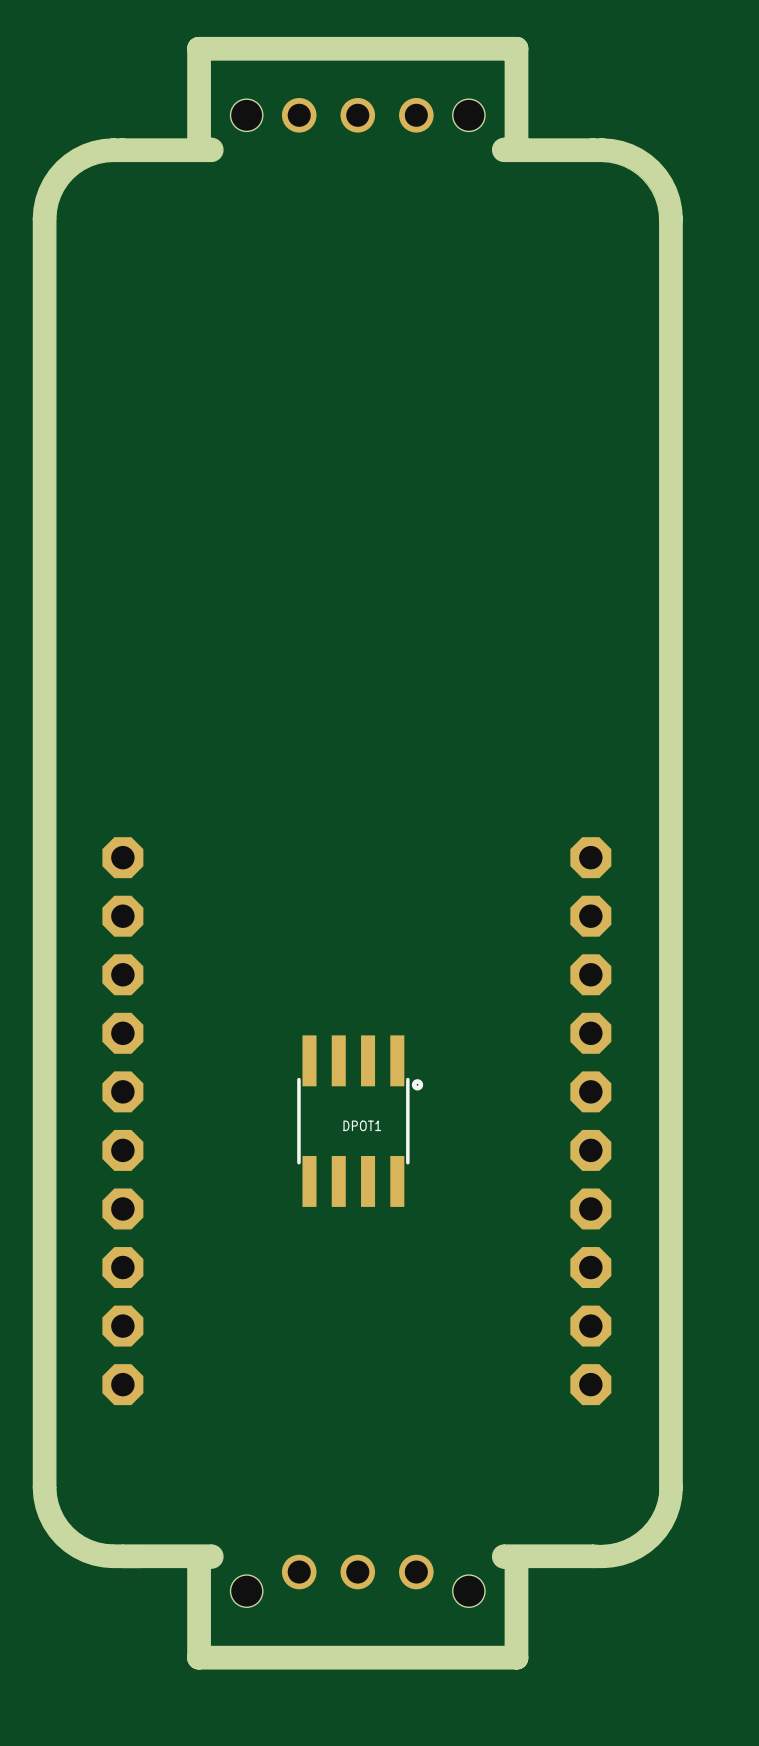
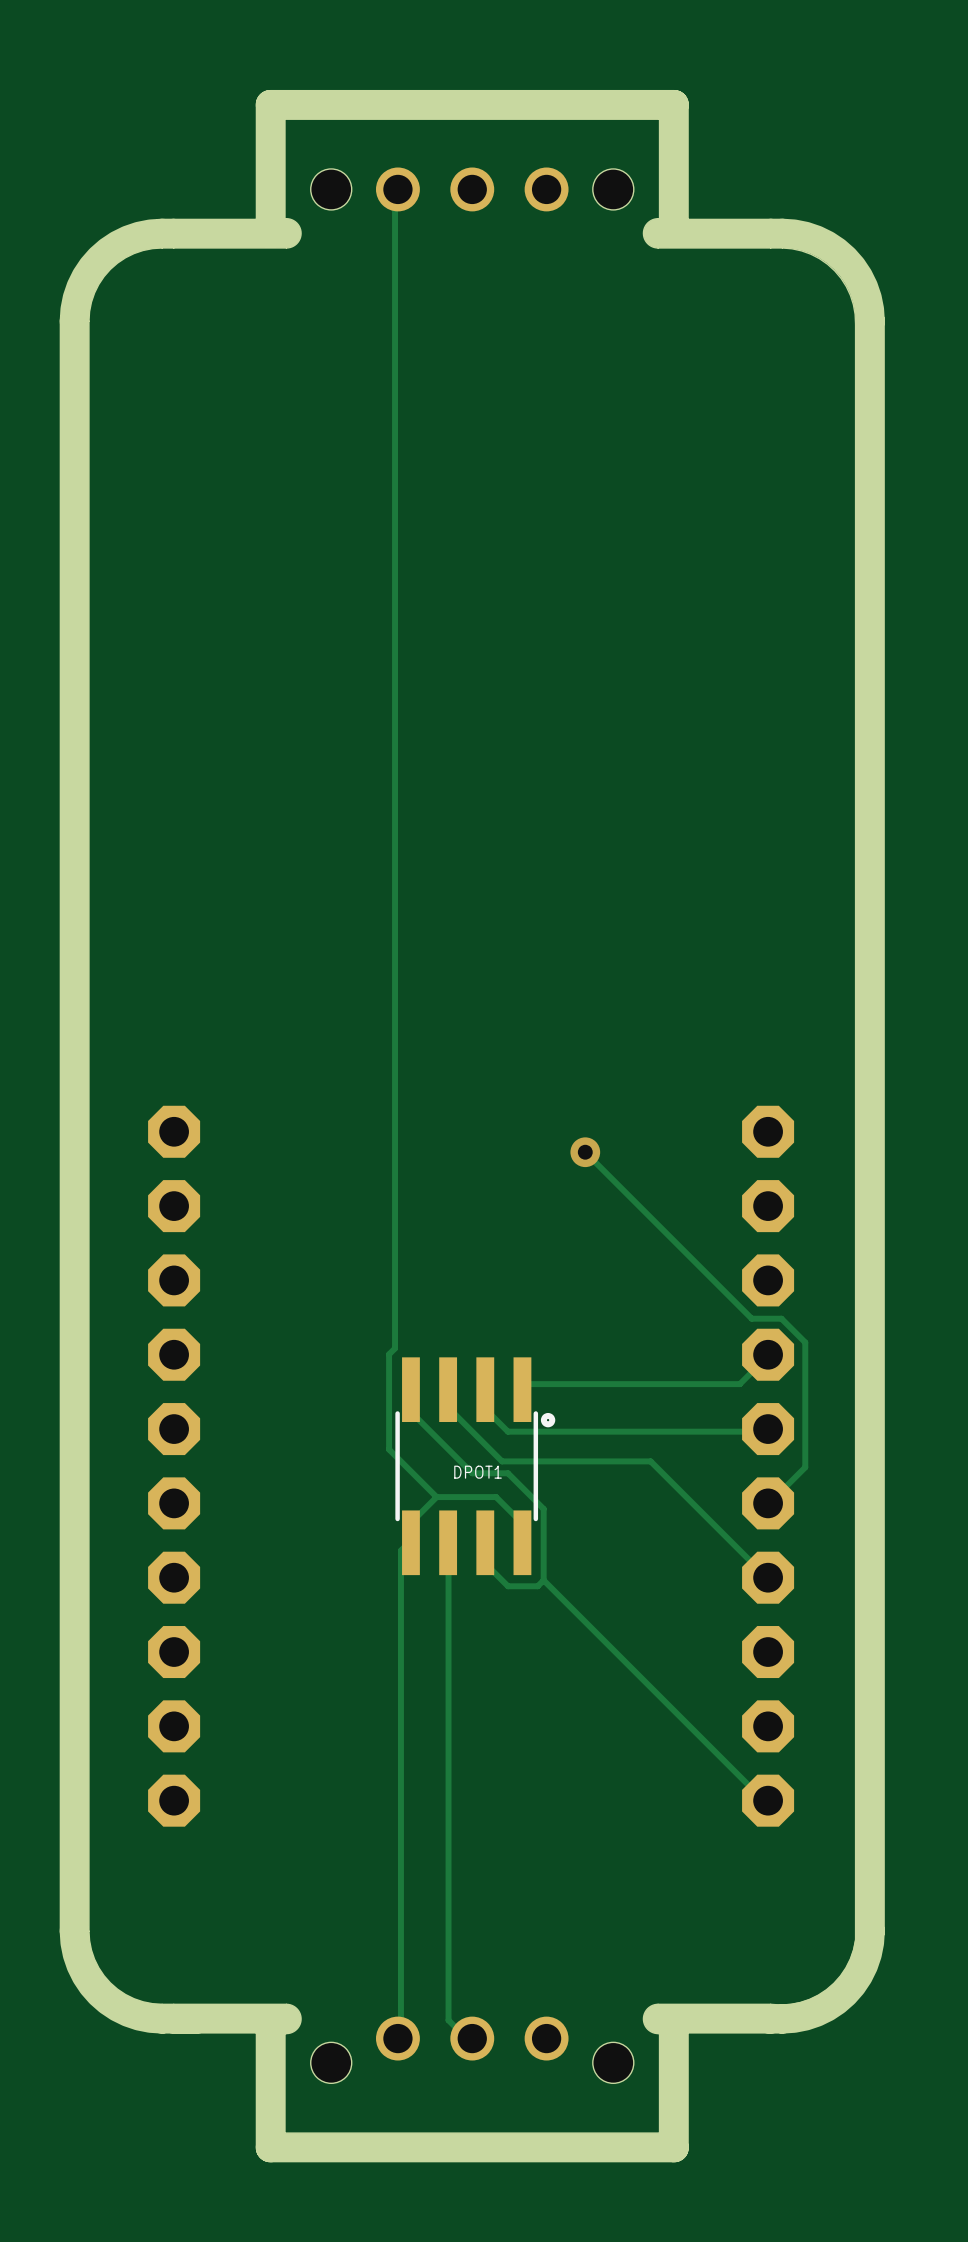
track: none -> (397, 189) (395, 194) (395, 1348) (389, 1354) (389, 1449) (436, 1497)
track: none -> (585, 1152) (751, 1318) (781, 1318) (805, 1342) (805, 1467) (768, 1503)
via: none -> (585, 1152)
track: none -> (768, 1354) (739, 1384) (525, 1384) (522, 1389)
track: none -> (410, 1389) (412, 1390) (412, 1413) (472, 1473) (507, 1473) (543, 1508) (543, 1580)
track: none -> (485, 1389) (490, 1390) (490, 1413) (507, 1431) (763, 1431) (768, 1429)
track: none -> (448, 1390) (448, 1407) (502, 1461) (650, 1461) (768, 1577)
track: none -> (436, 1497) (496, 1497) (519, 1520) (519, 1538) (522, 1542)
track: none -> (436, 1497) (412, 1520) (412, 1538) (410, 1542) (400, 1550) (400, 2038) (397, 2038)
track: none -> (448, 1542) (448, 2020) (466, 2038) (472, 2038)
track: none -> (485, 1542) (490, 1544) (490, 1568) (507, 1586) (537, 1586) (543, 1580)
track: none -> (543, 1580) (763, 1800) (768, 1800)

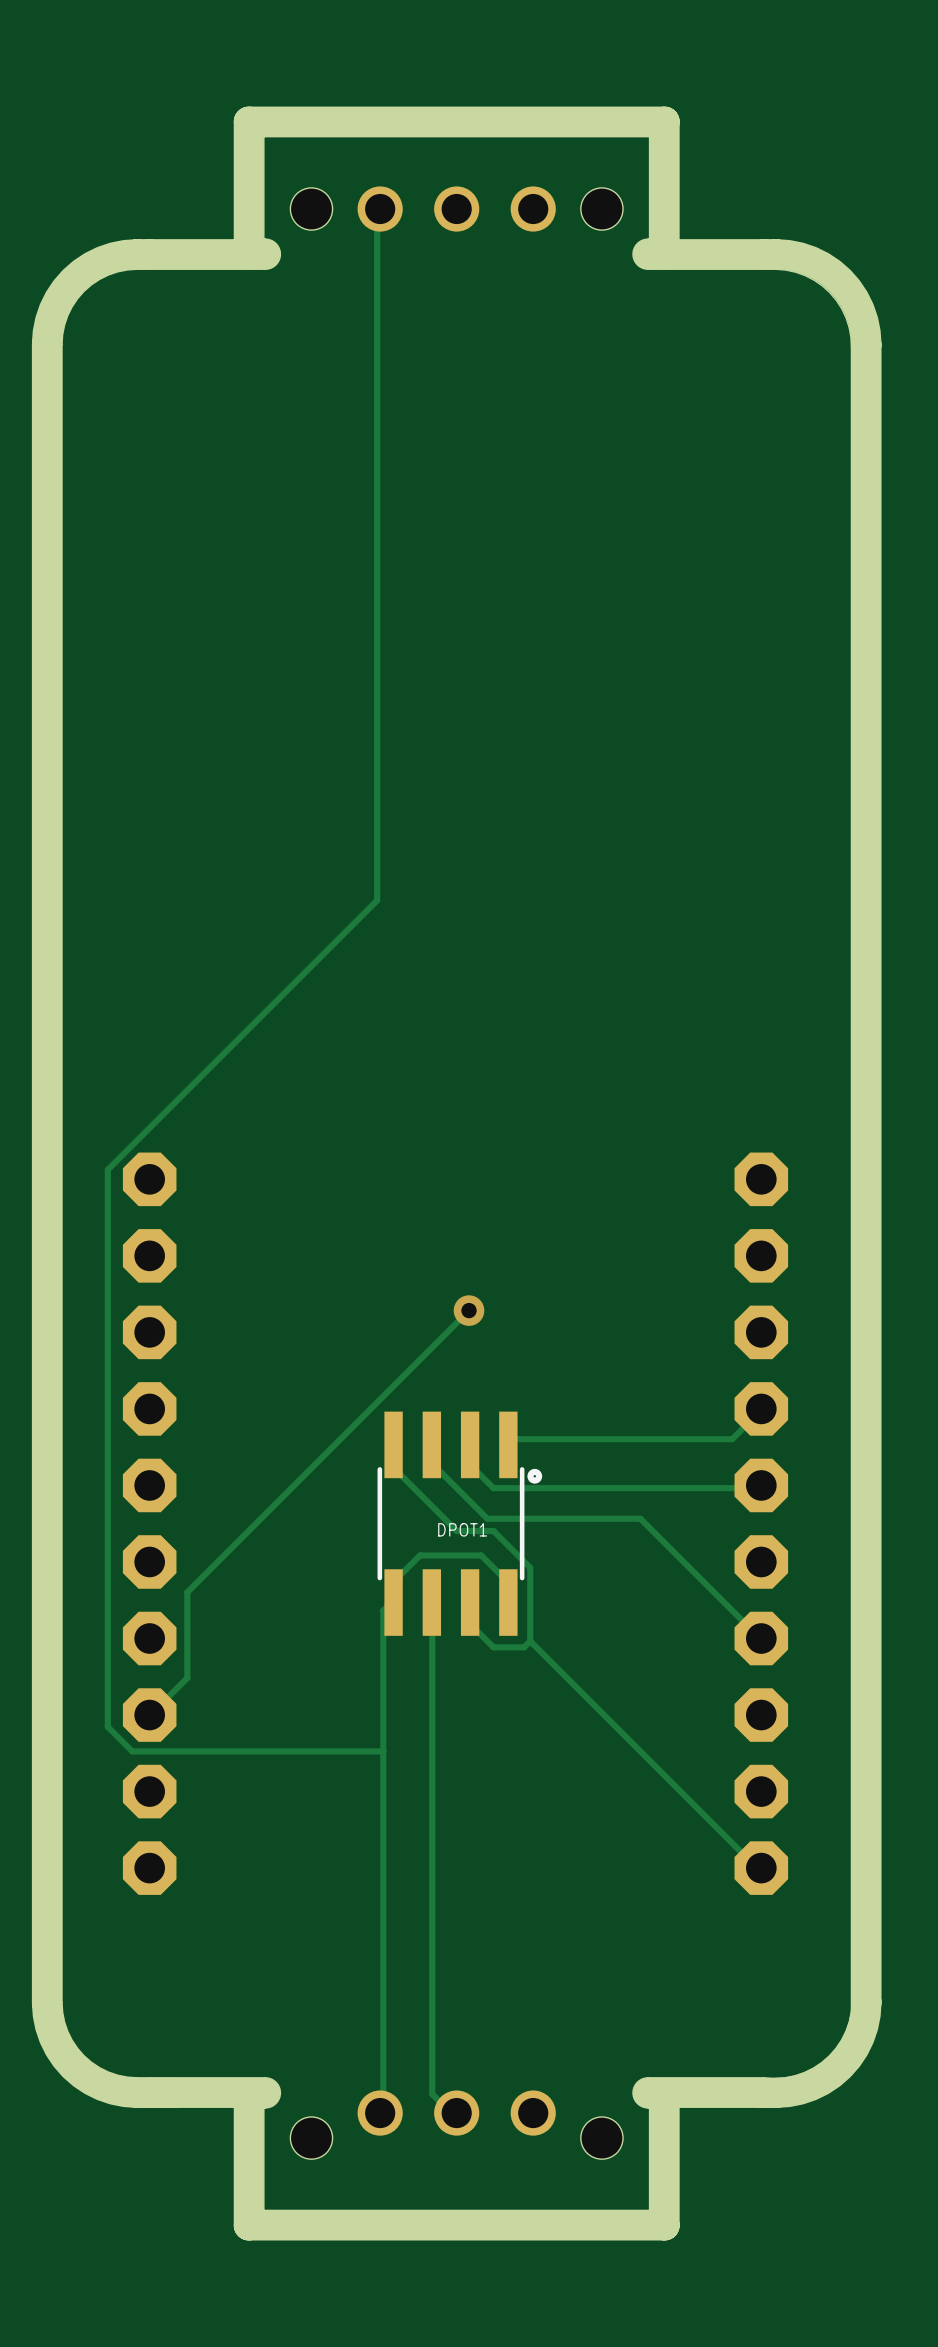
track: (395, 860) (395, 1348) -> (377, 900) (107, 1169) (107, 1726) (132, 1751) (383, 1751)
track: (585, 1152) (751, 1318) (781, 1318) (805, 1342) (805, 1467) (768, 1503) -> none
via position: (585, 1152) -> (469, 1310)
track: none -> (469, 1310) (377, 1402)
track: (389, 1354) (389, 1449) (436, 1497) -> (371, 1408) (187, 1592) (187, 1677) (149, 1715)

